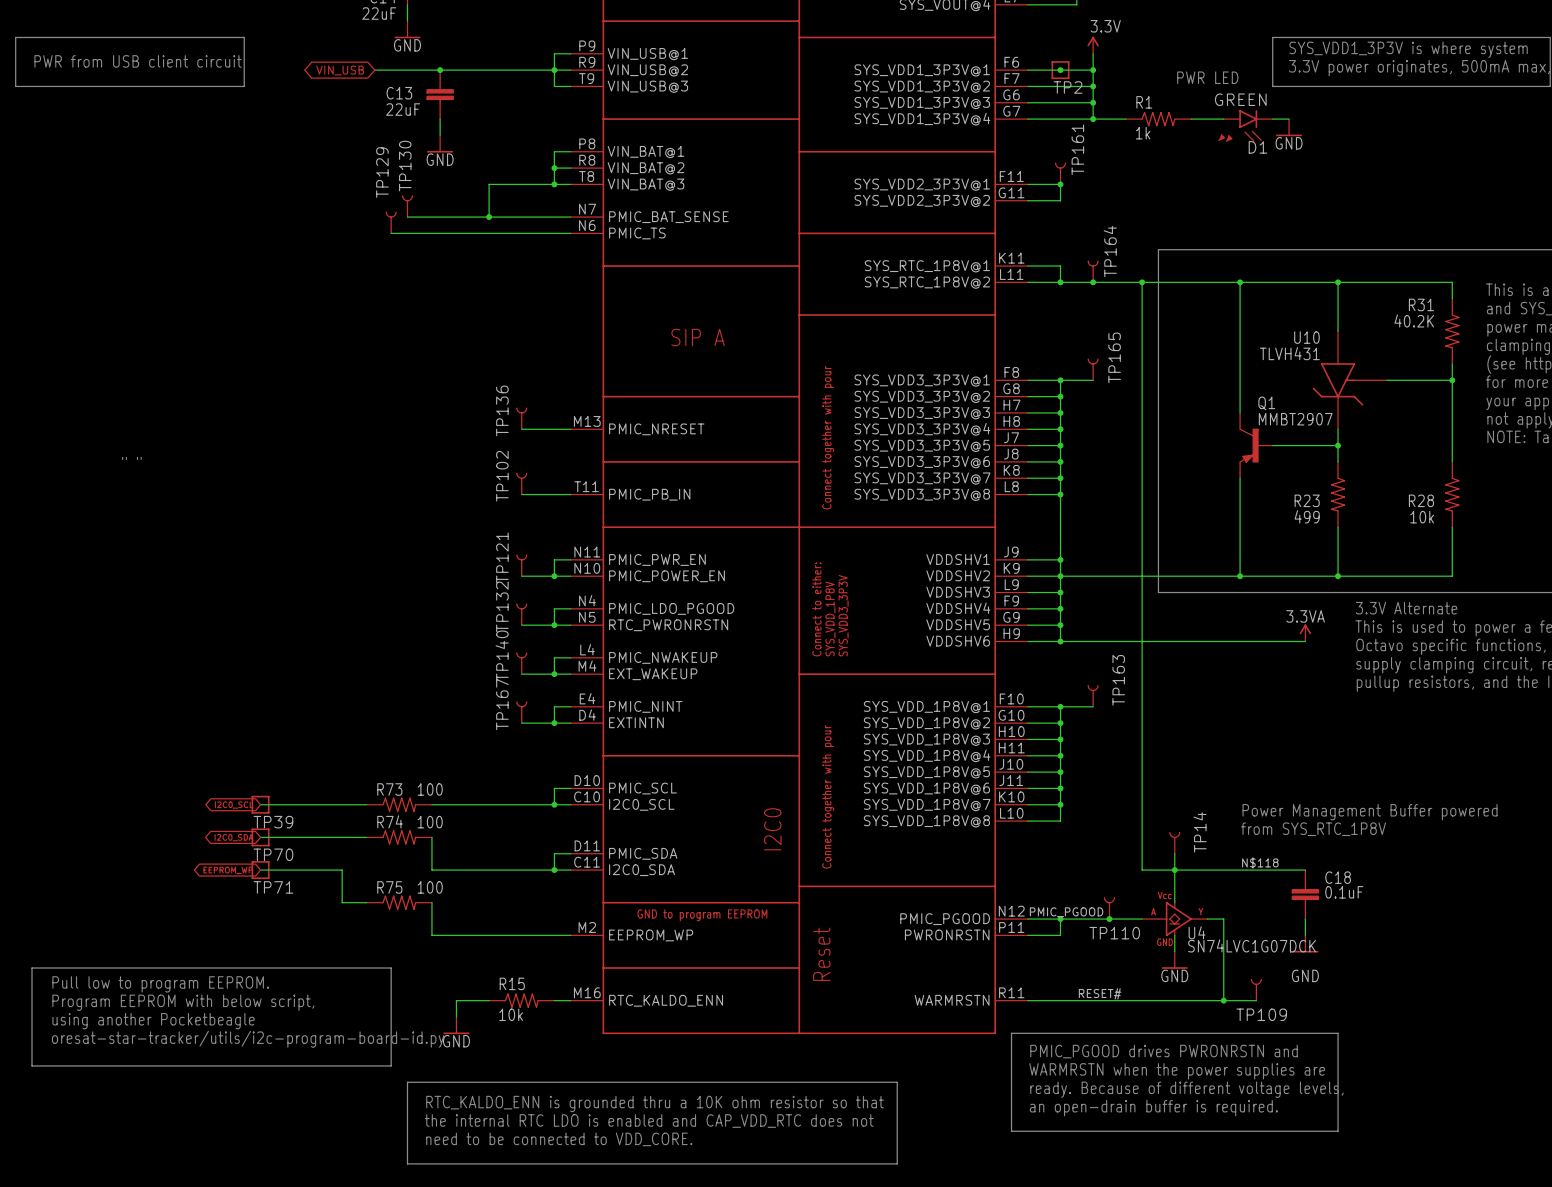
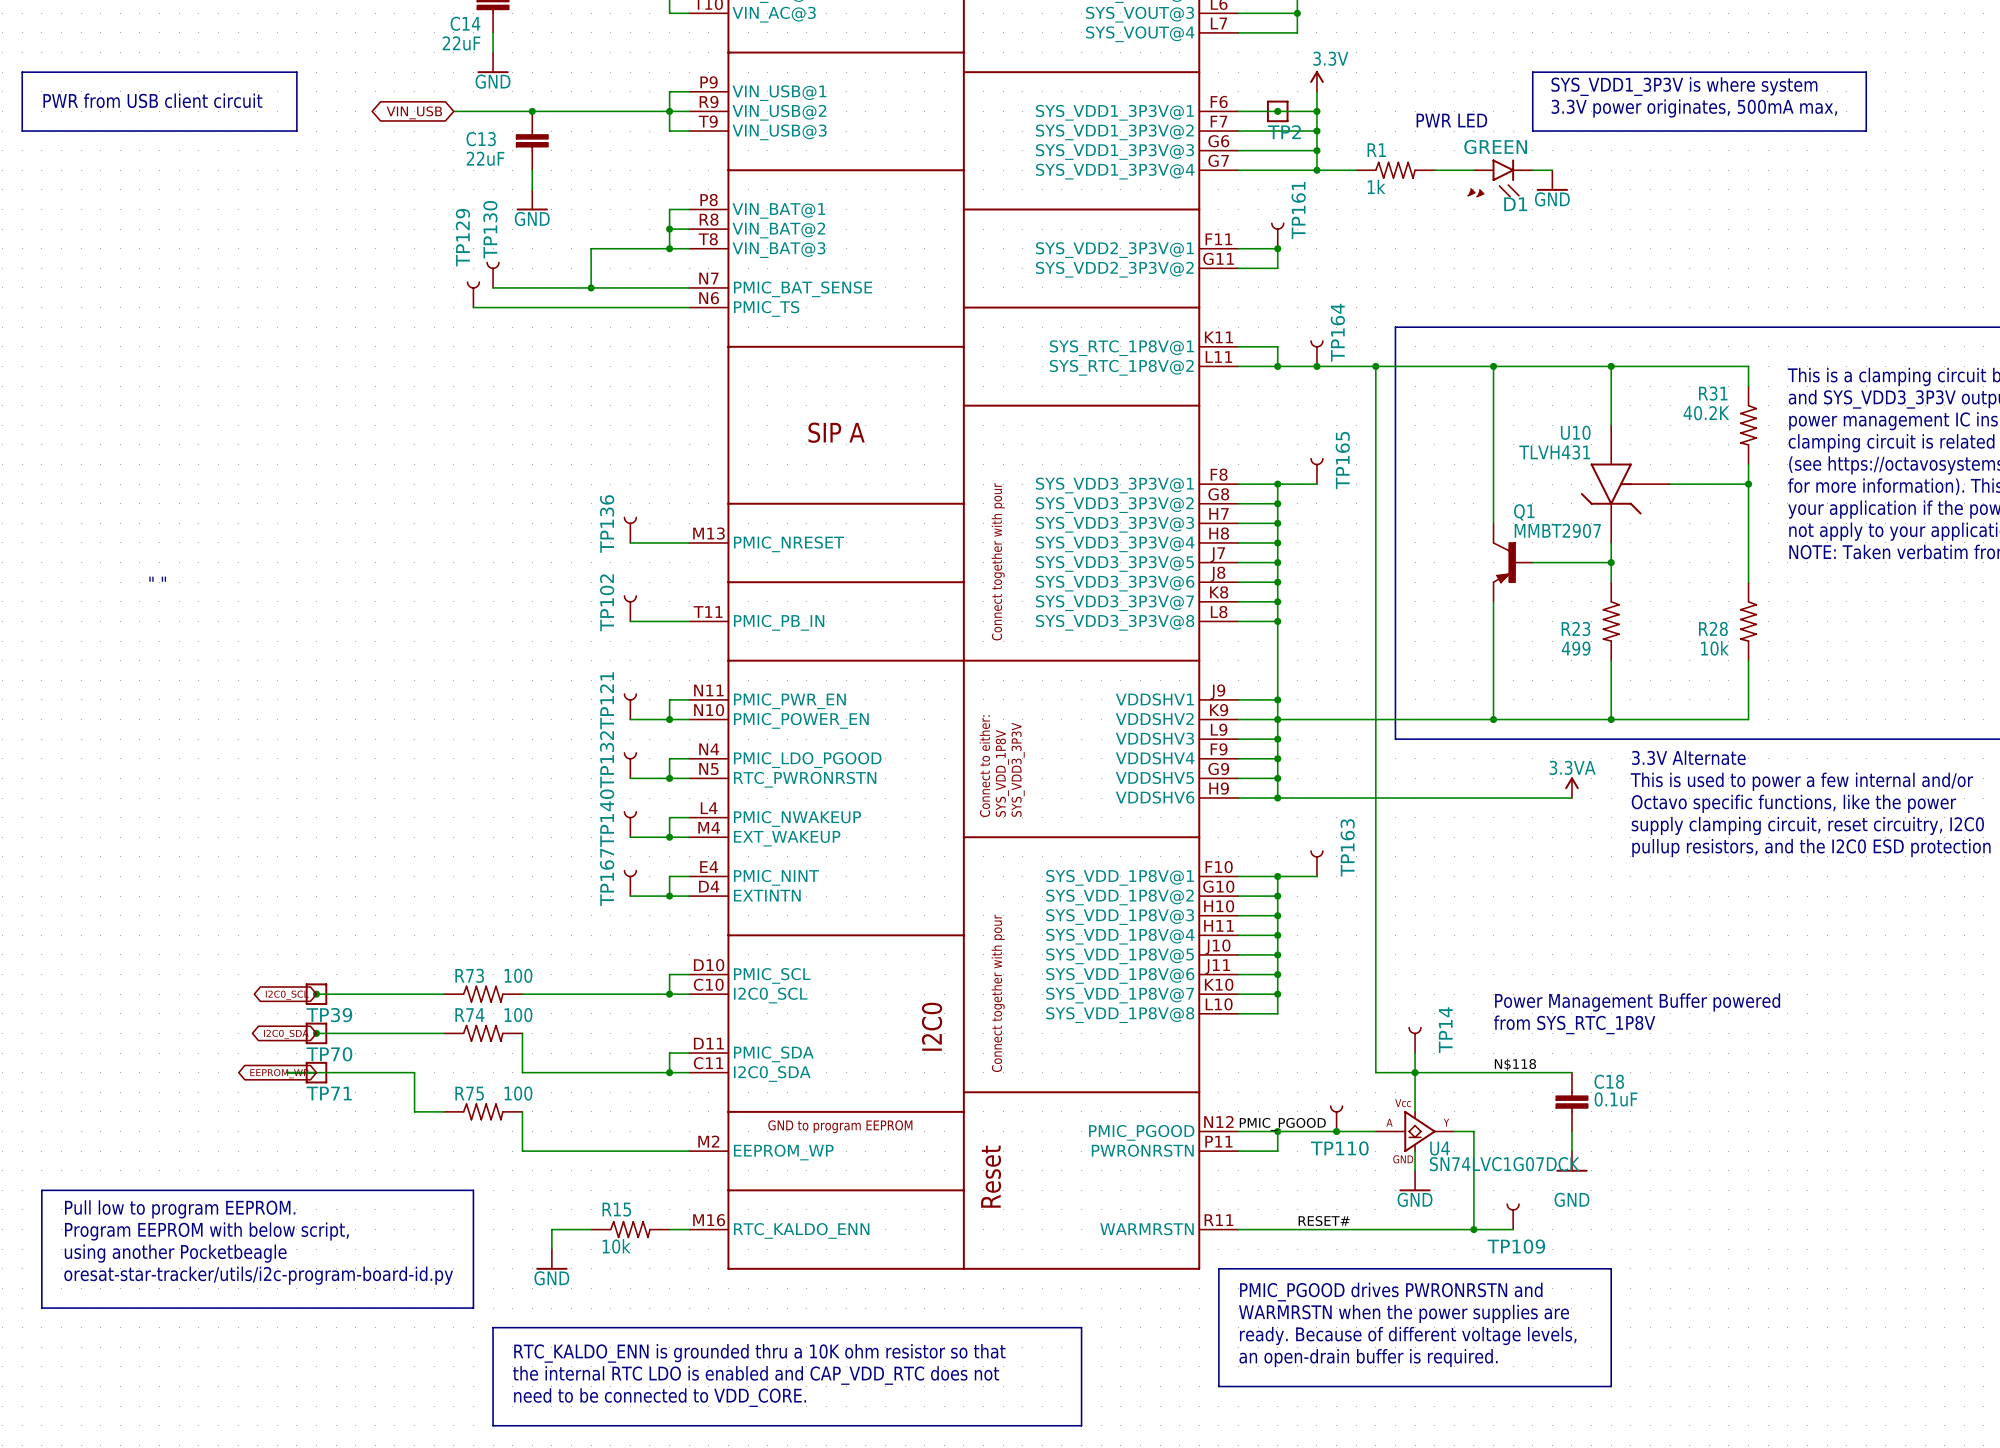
junction: none -> (316, 994)
junction: none -> (316, 1033)
wire: none -> (287, 1072) (316, 1072)

